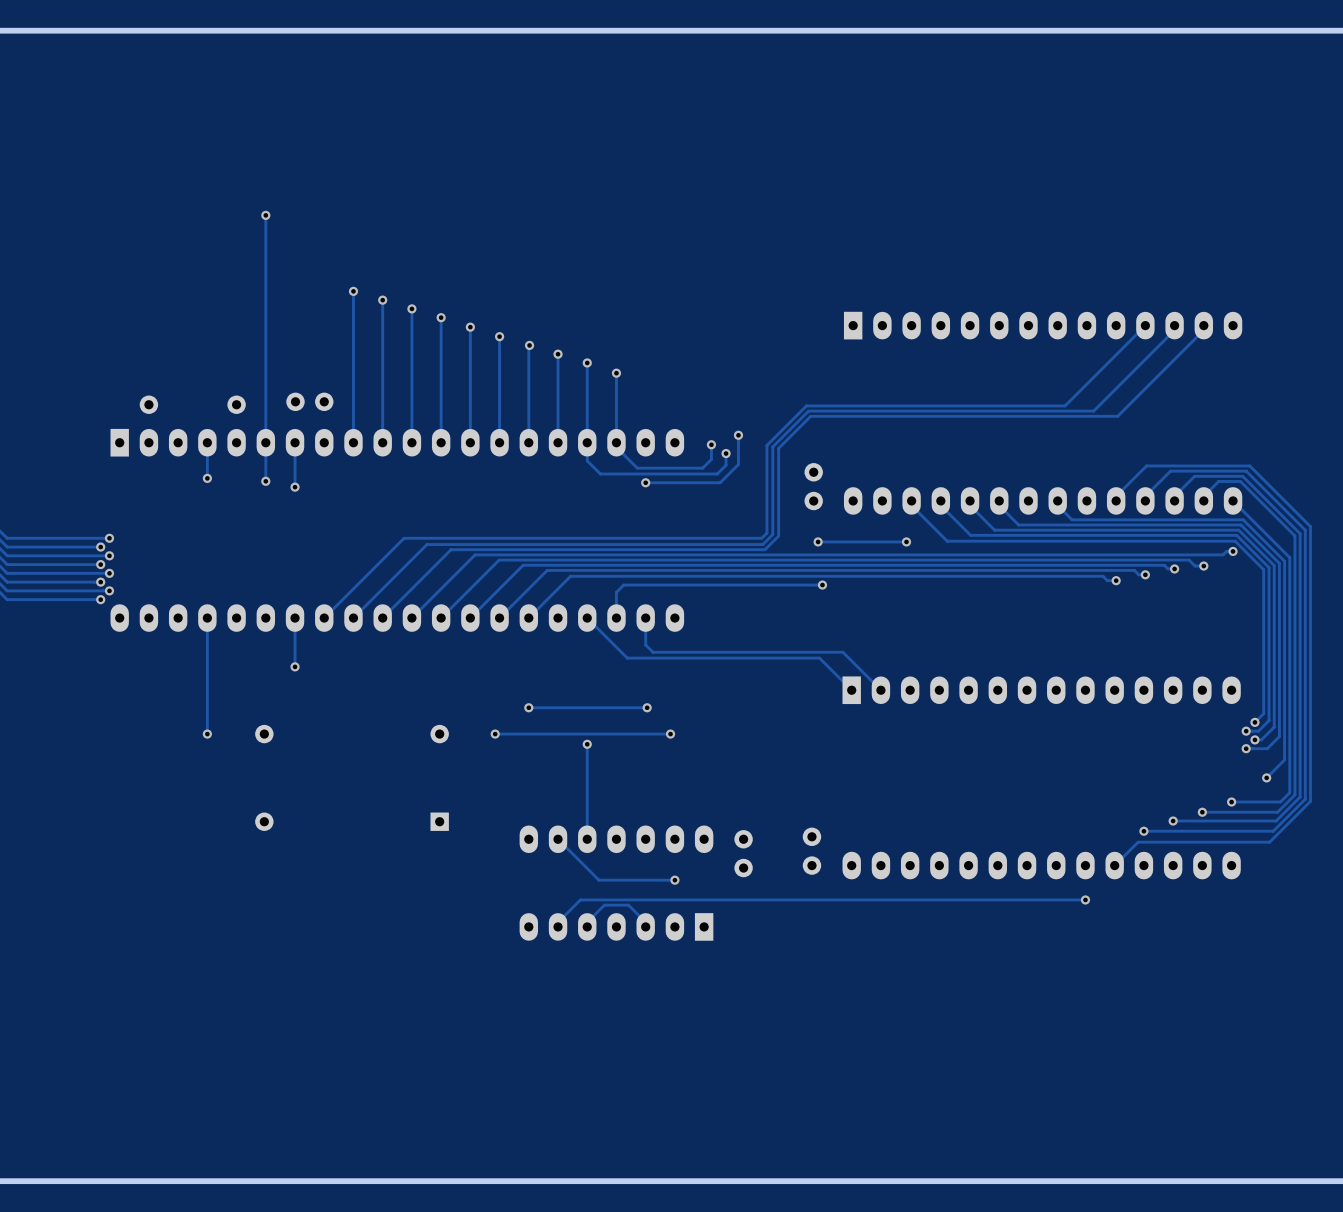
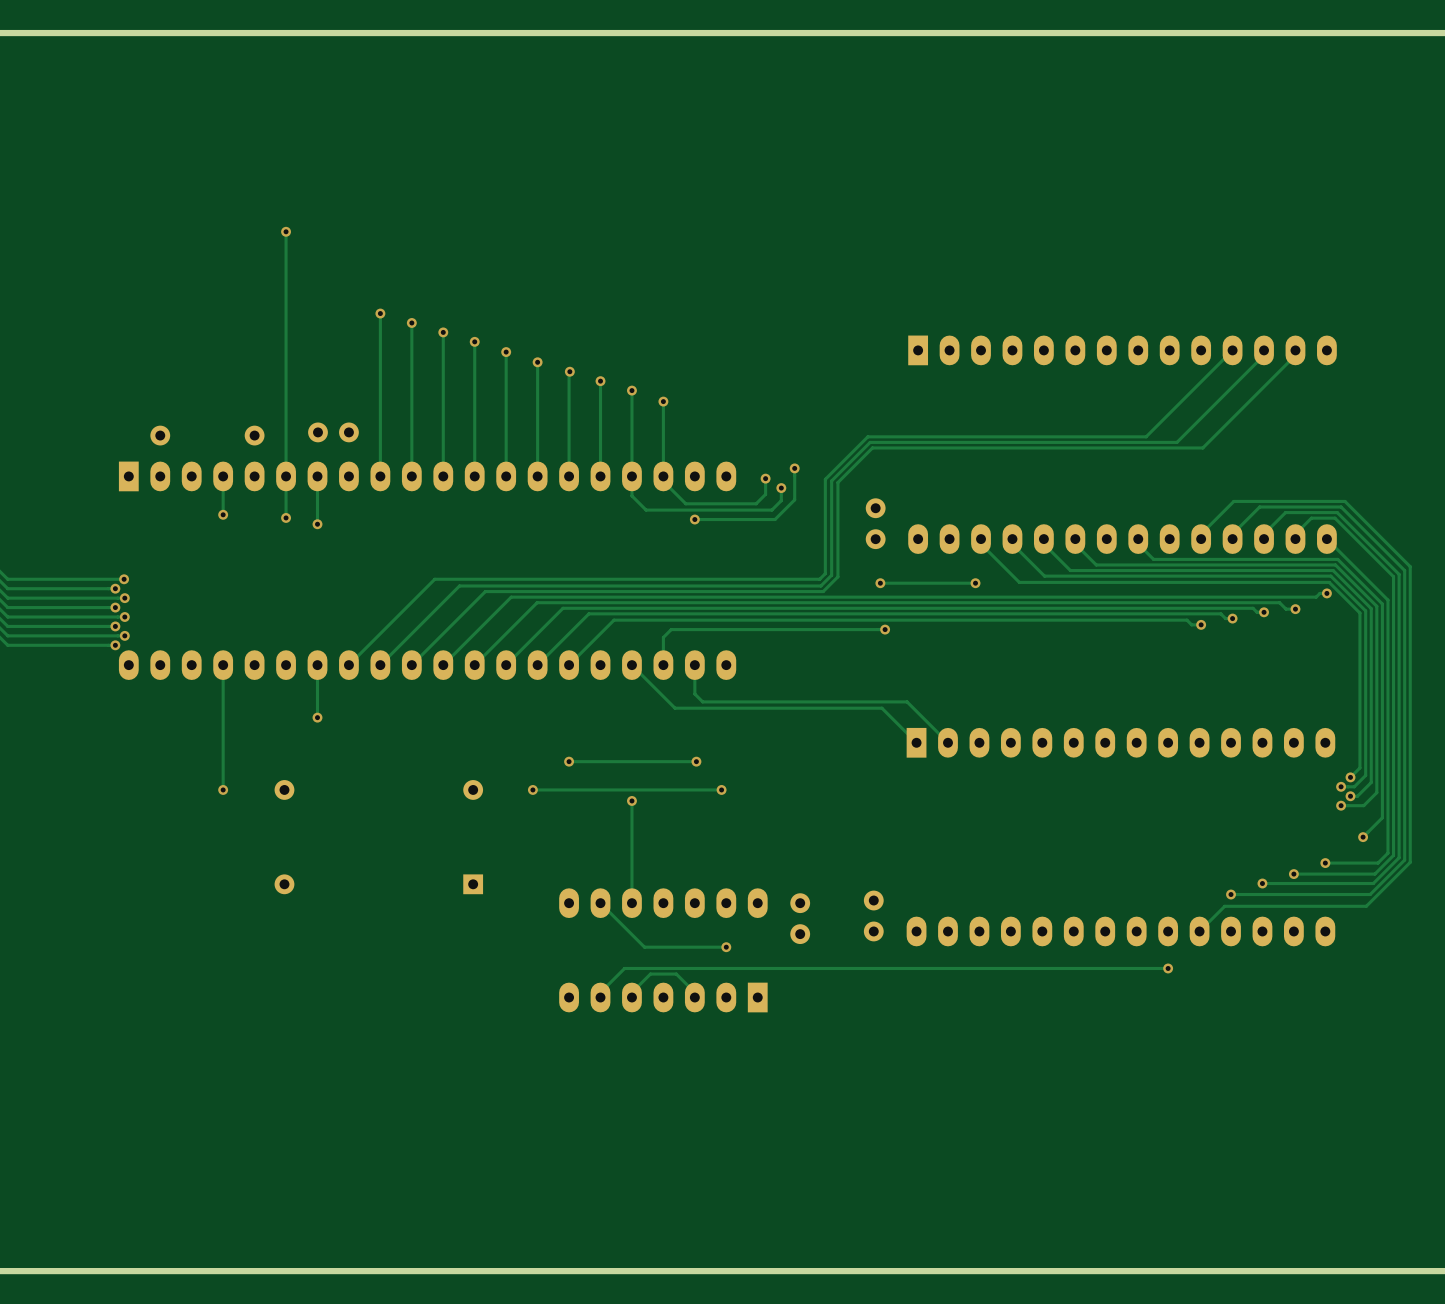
via: (109, 538) -> none
via: none -> (124, 579)
via: (100, 547) -> none
via: none -> (115, 588)
via: (109, 555) -> none
via: none -> (124, 598)
via: (100, 564) -> none
via: none -> (115, 607)
via: (109, 573) -> none
via: none -> (124, 617)
via: (100, 582) -> none
via: none -> (115, 626)
via: (109, 590) -> none
via: none -> (124, 635)
via: (100, 599) -> none
via: none -> (115, 645)

